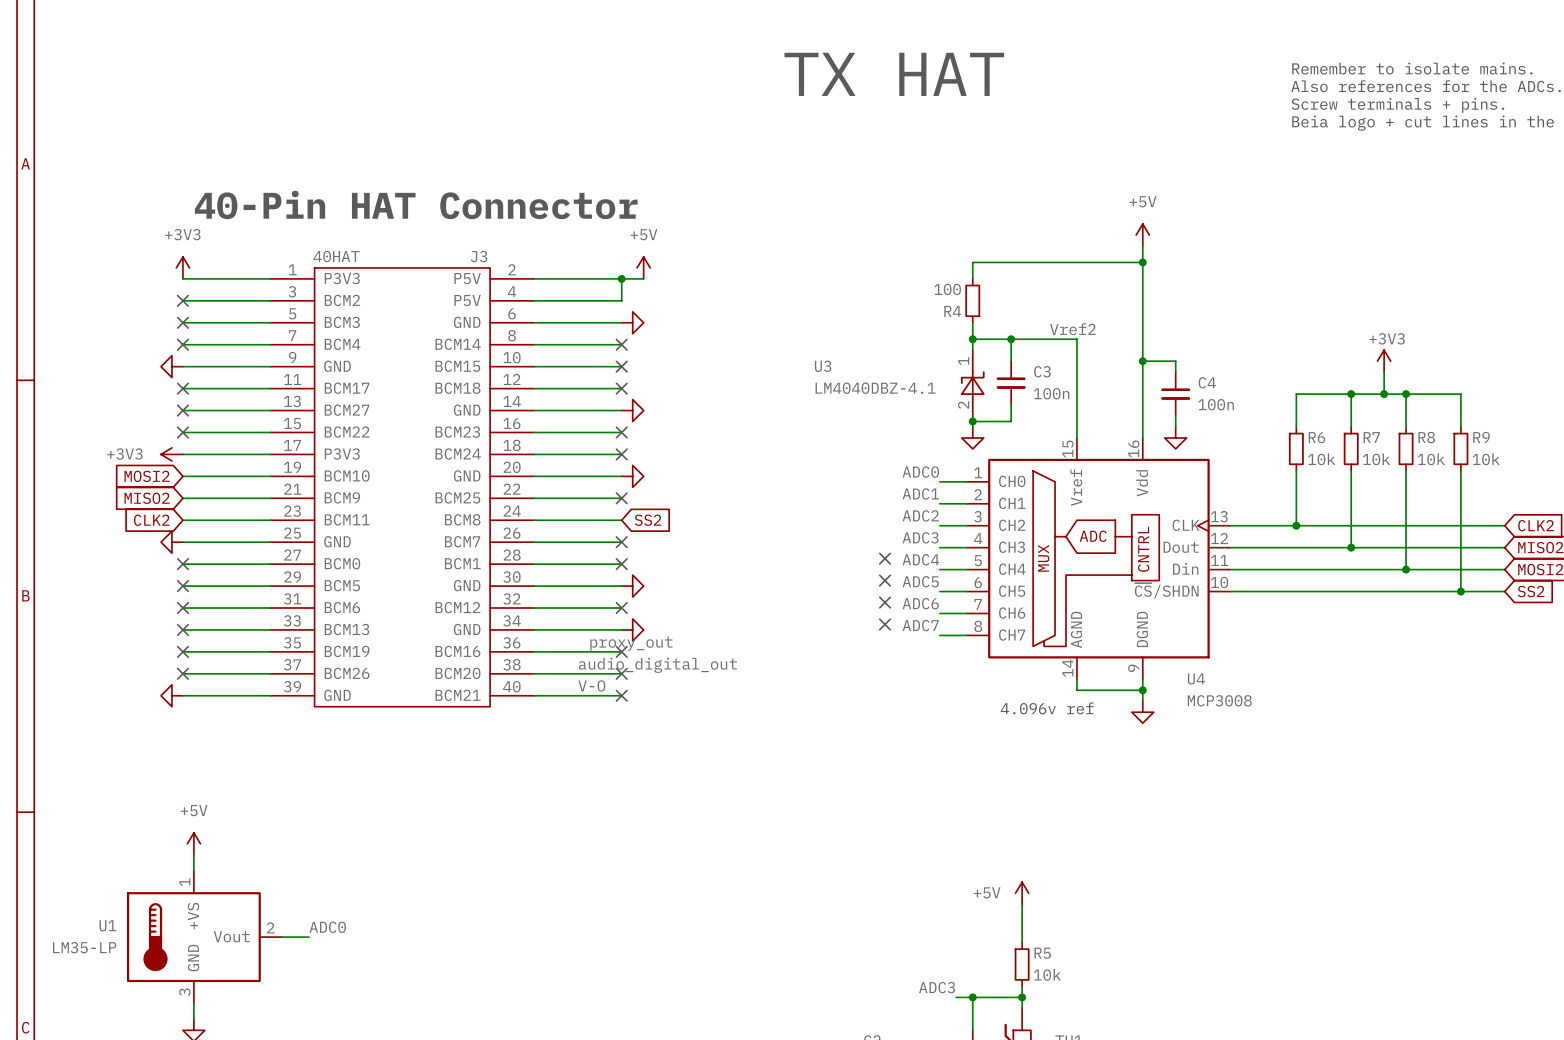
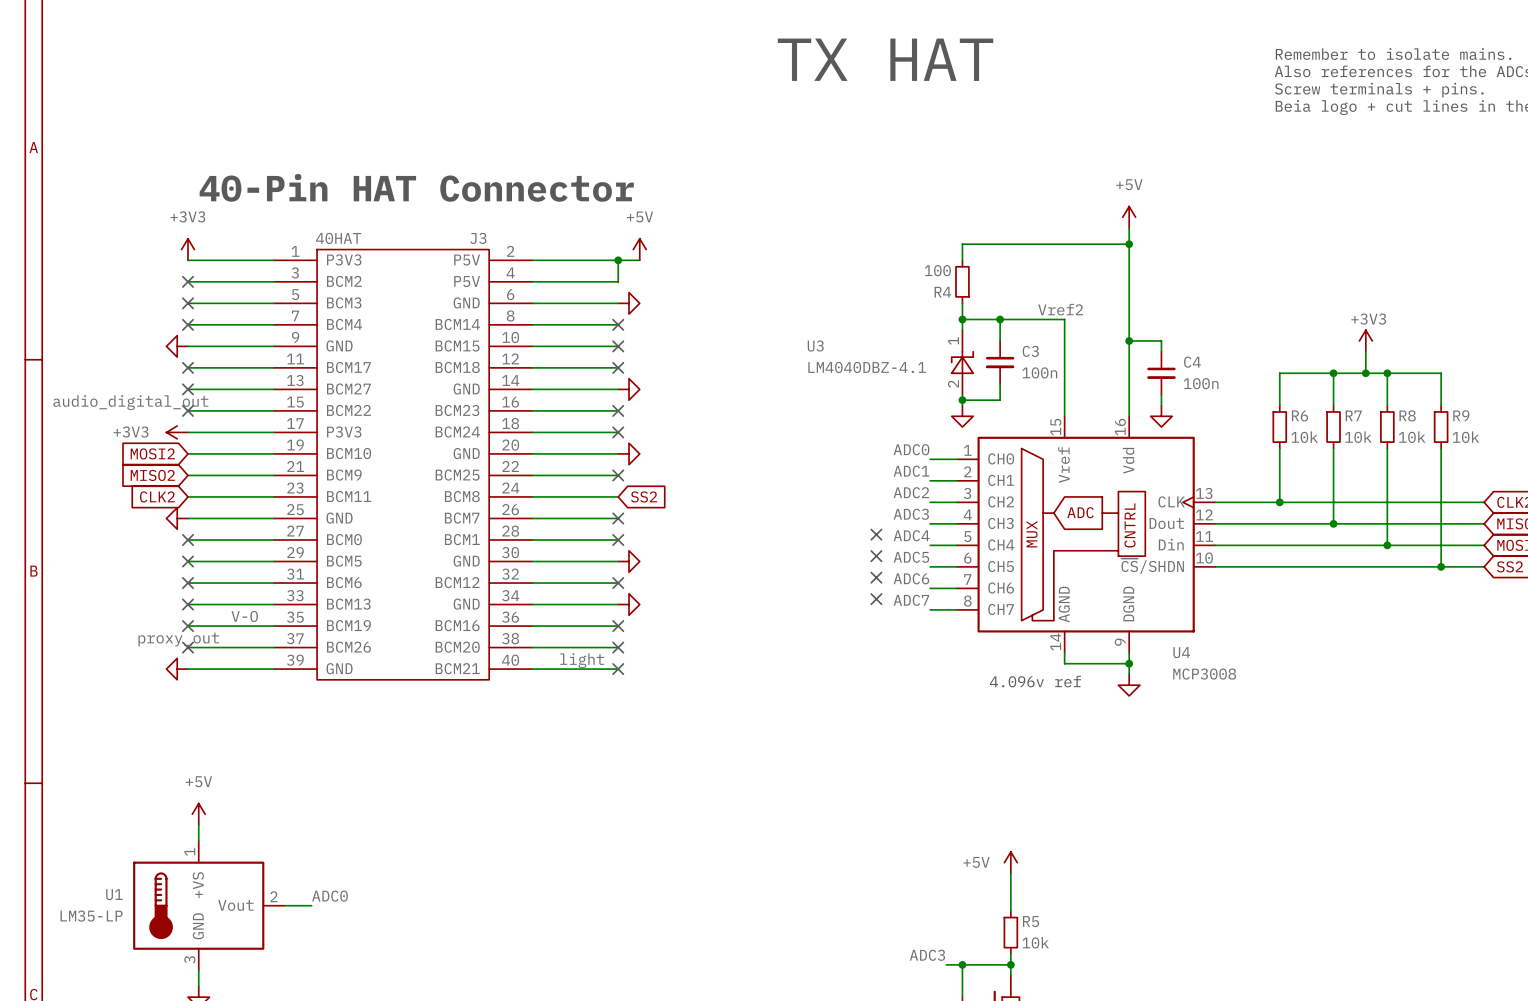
label: none -> audio_digital_out (130, 402)
label: none -> V-O (244, 616)
label: proxy_out (631, 643) -> none
label: none -> proxy_out (178, 639)
label: audio_digital_out (657, 665) -> none
label: V-O (591, 685) -> none
label: none -> light (582, 660)

